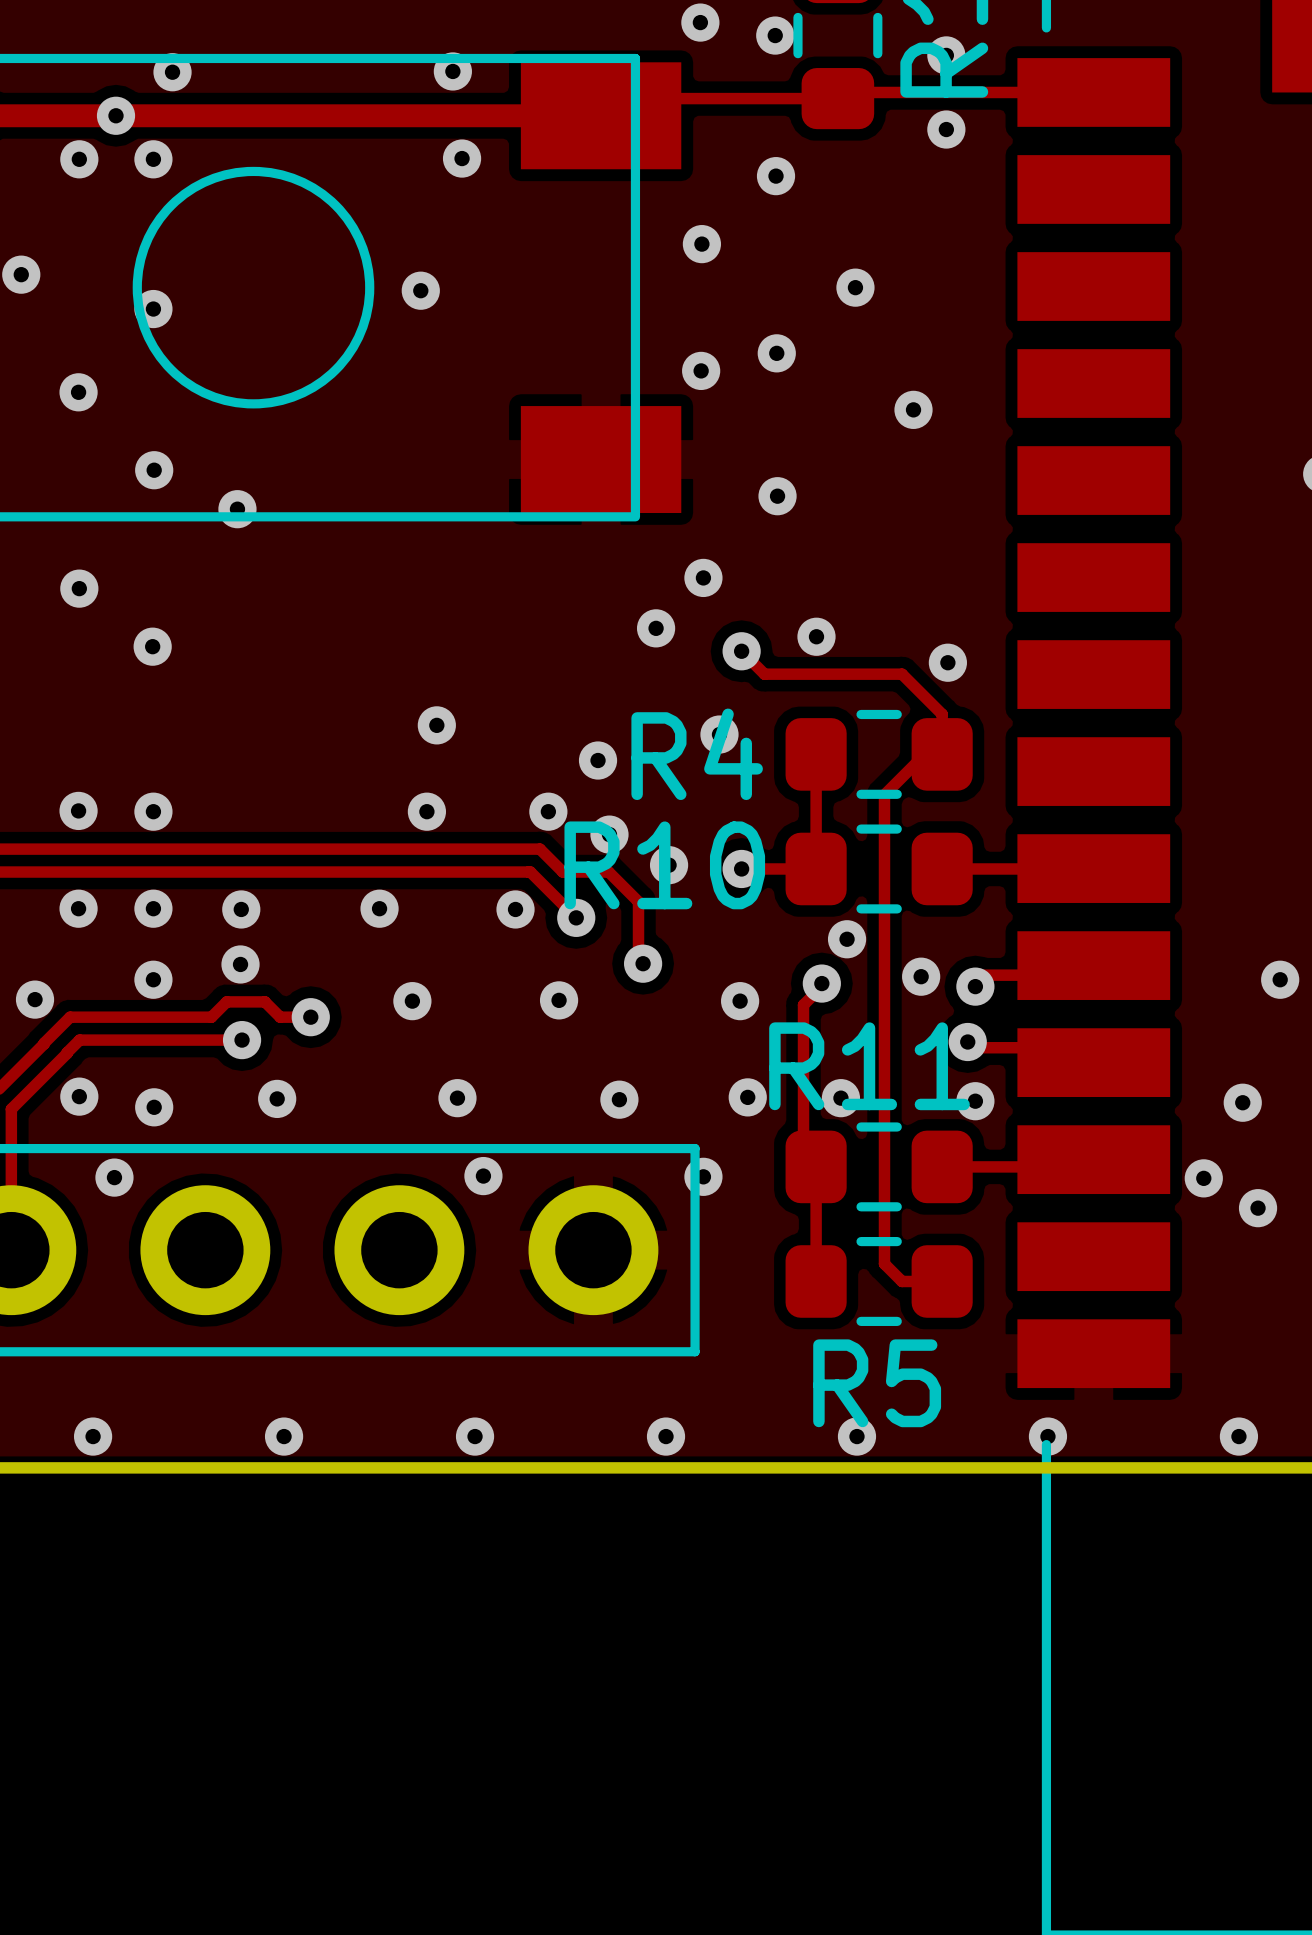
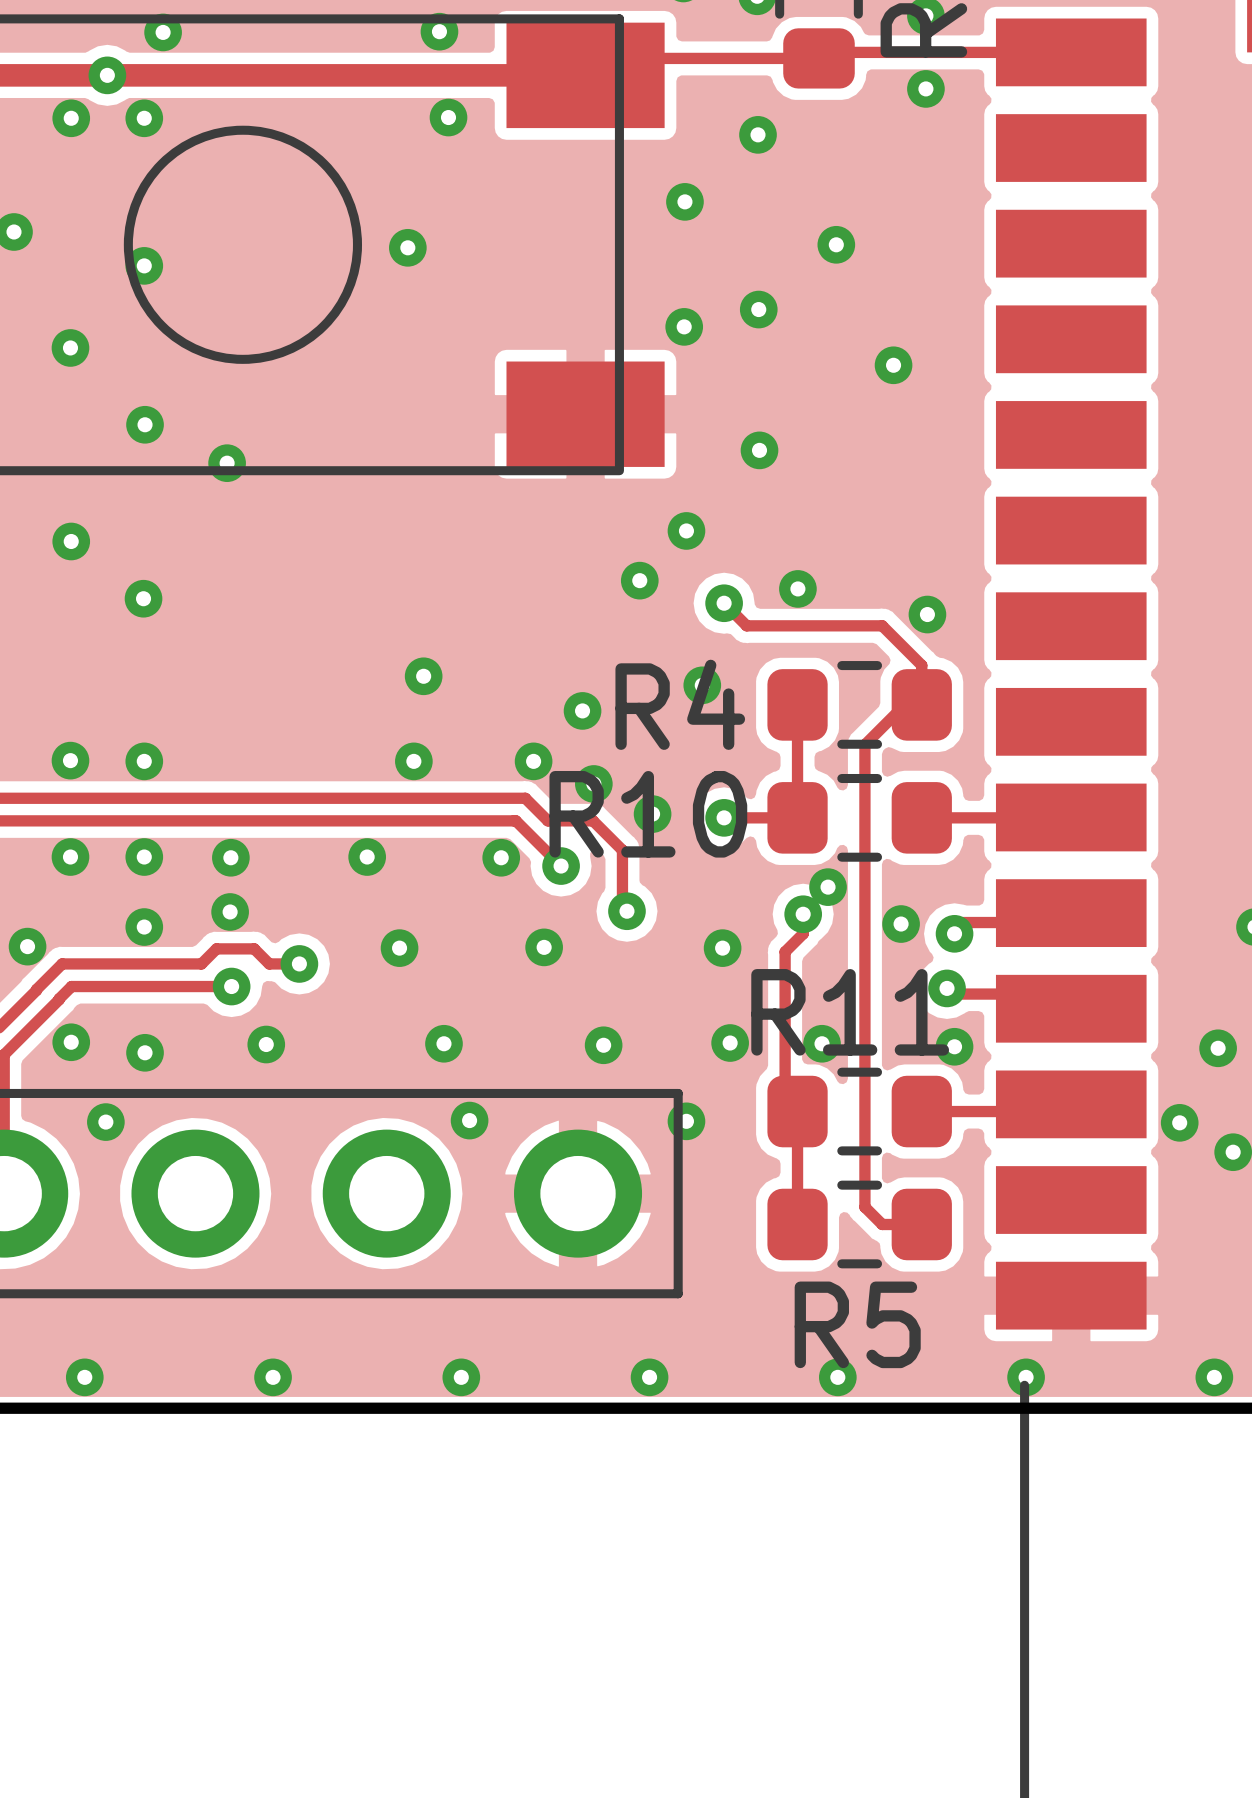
via position: (821, 983) -> (803, 914)

